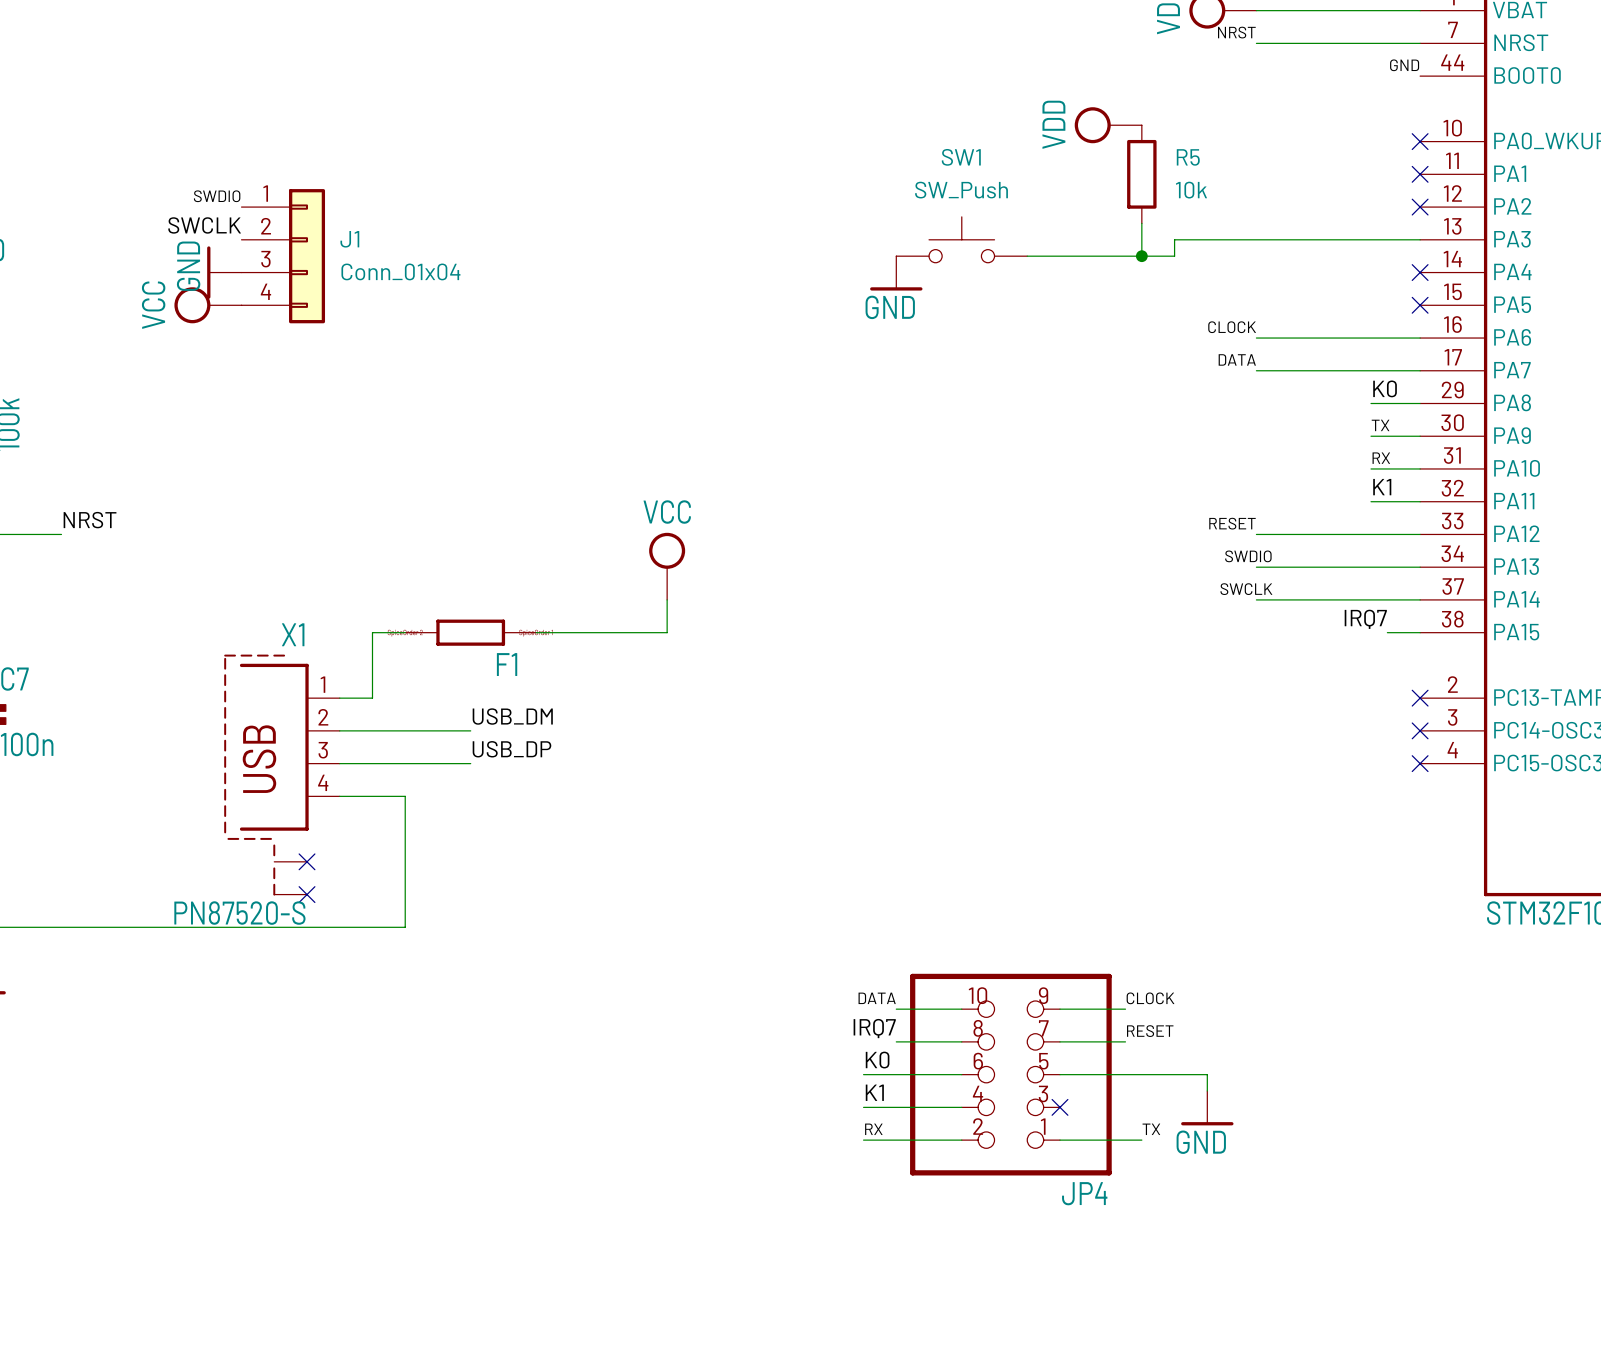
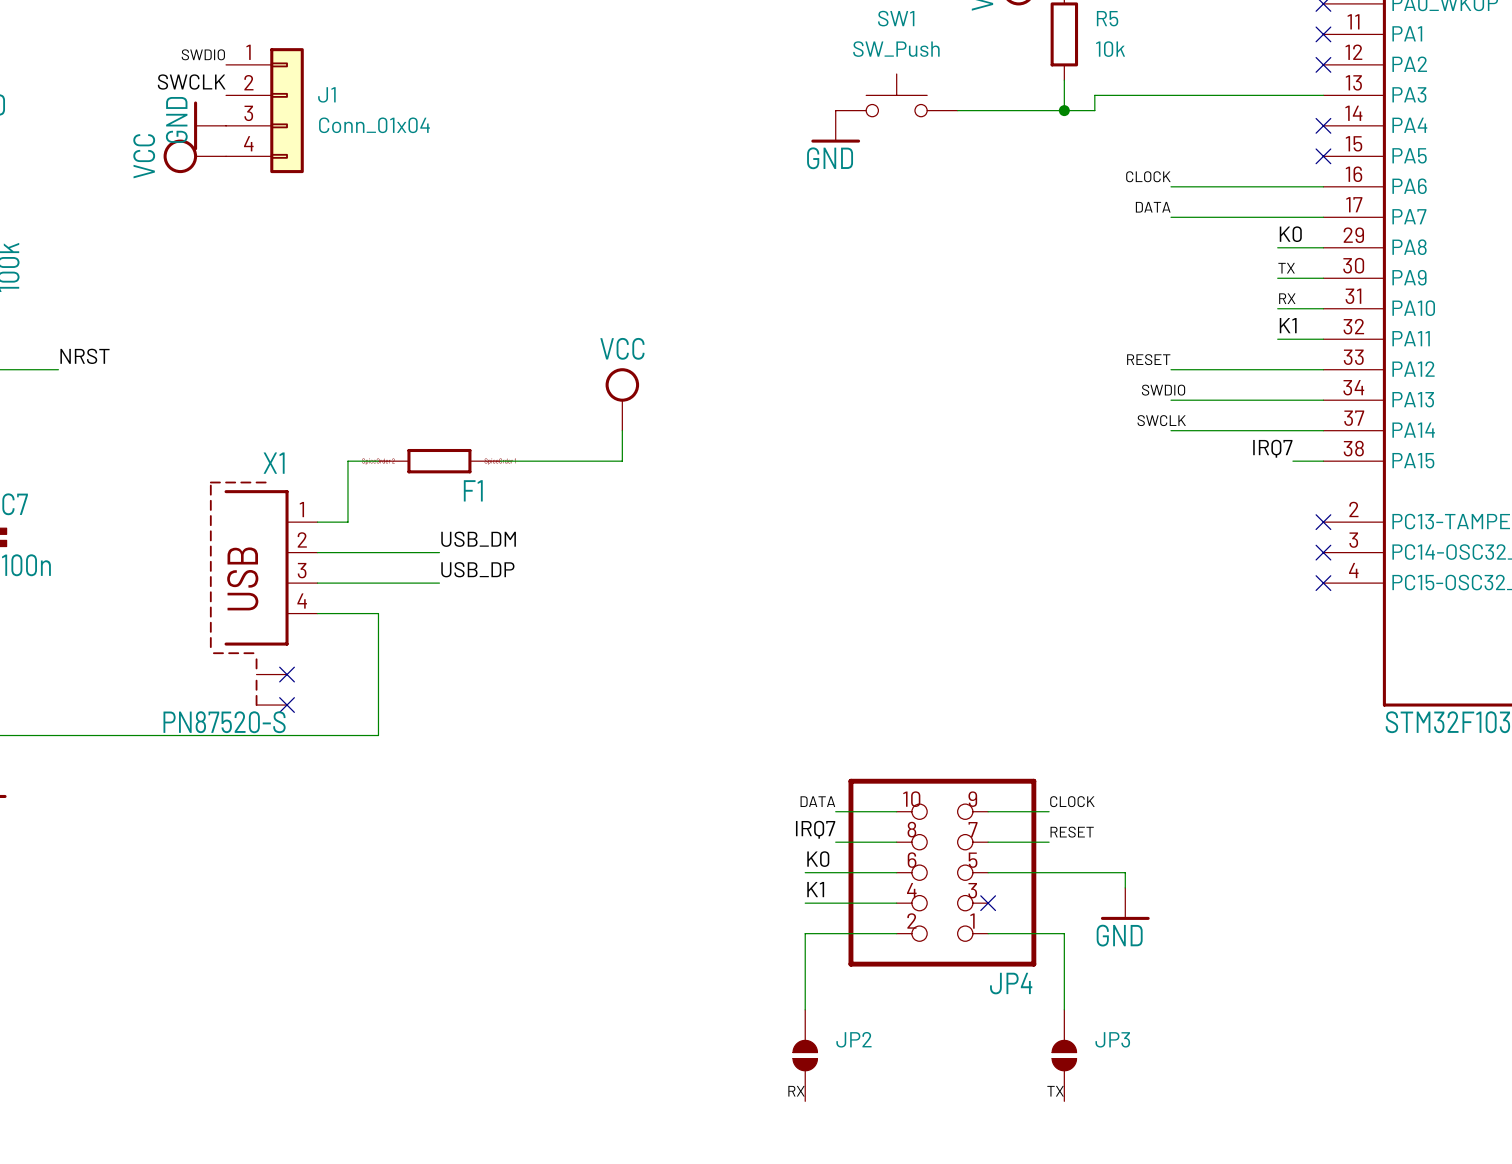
label position: RX (873, 1129) -> RX (796, 1091)
label position: TX (1151, 1129) -> TX (1055, 1091)
wire: none -> (805, 933) (805, 1009)
wire: none -> (1064, 933) (1064, 1009)
JP2: none -> (805, 1055)
JP3: none -> (1064, 1055)

